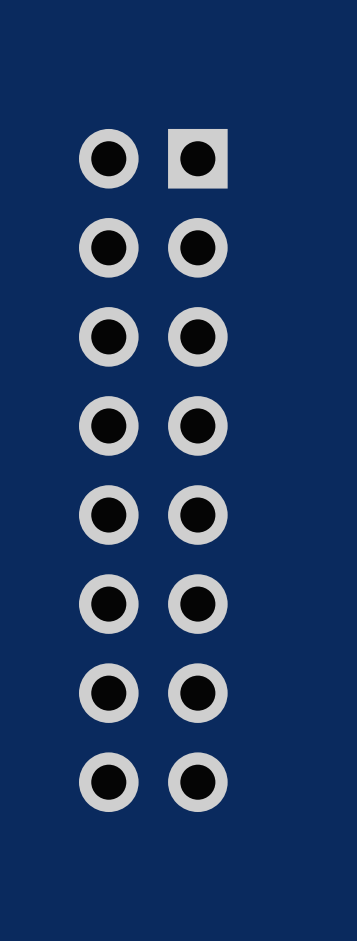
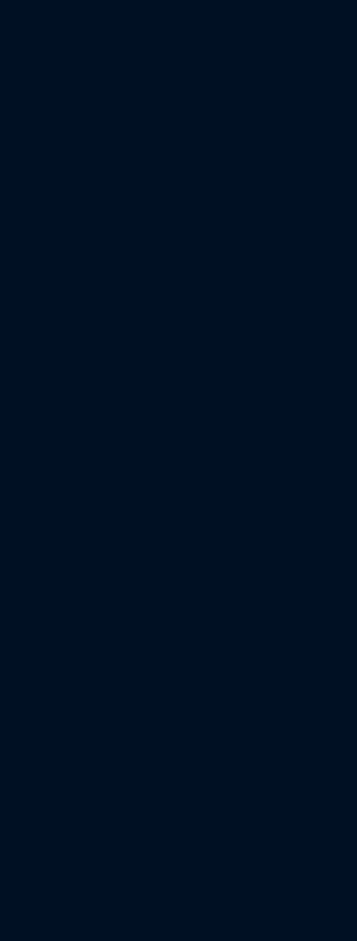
part: (153, 470) -> none

